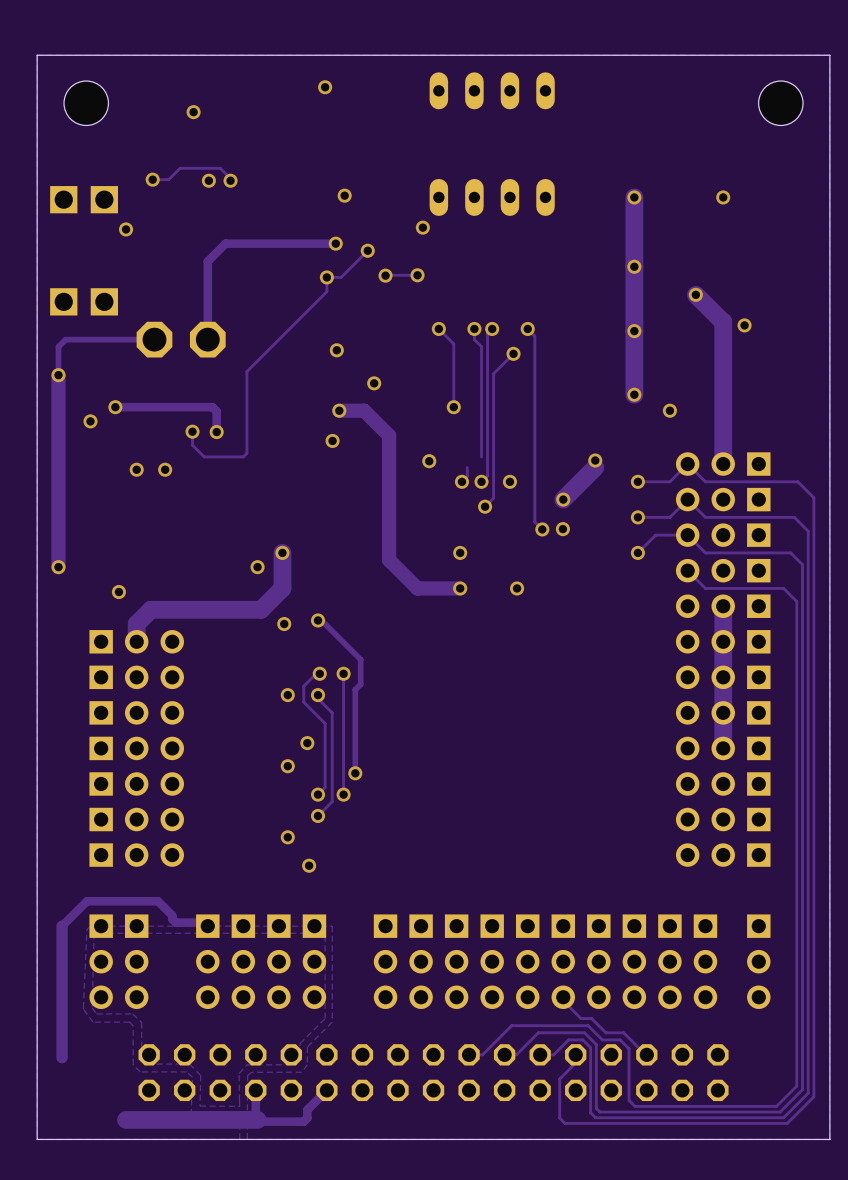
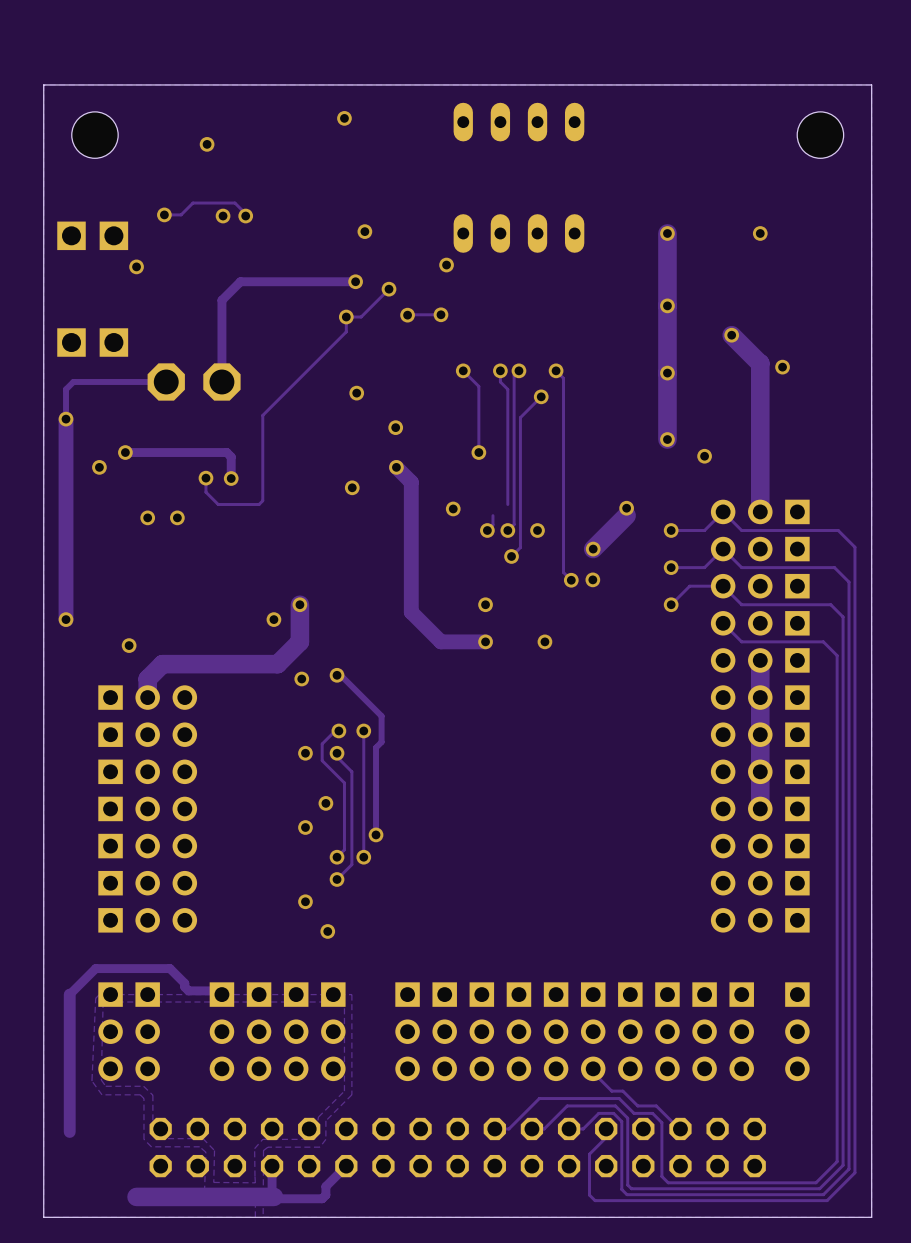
track: (339, 410) (364, 410) (374, 421) -> none
via position: (339, 410) -> (396, 467)

